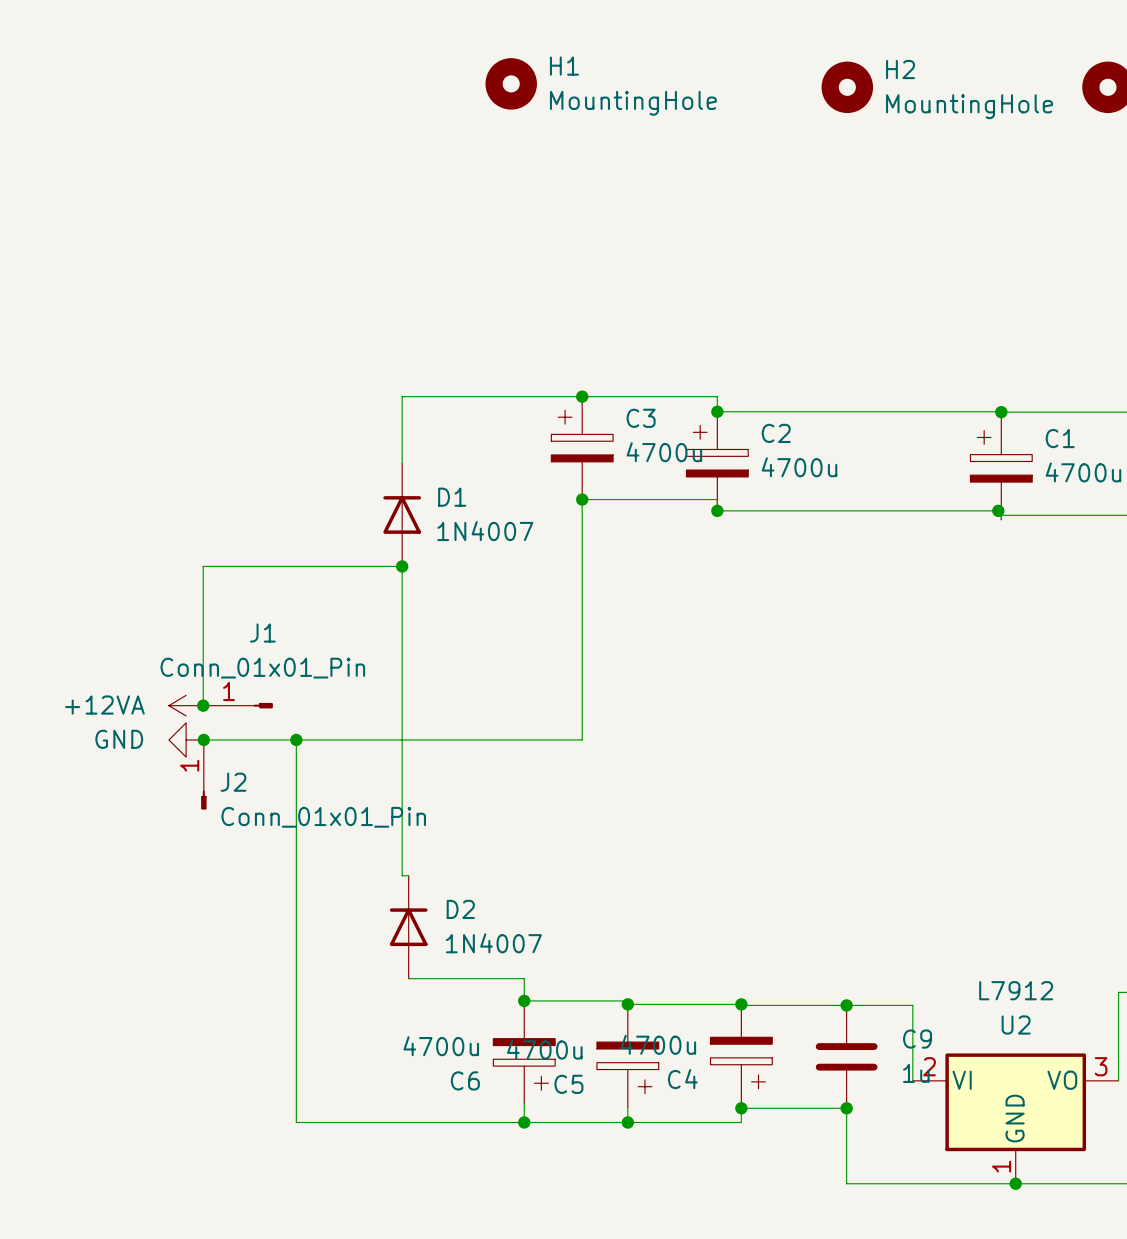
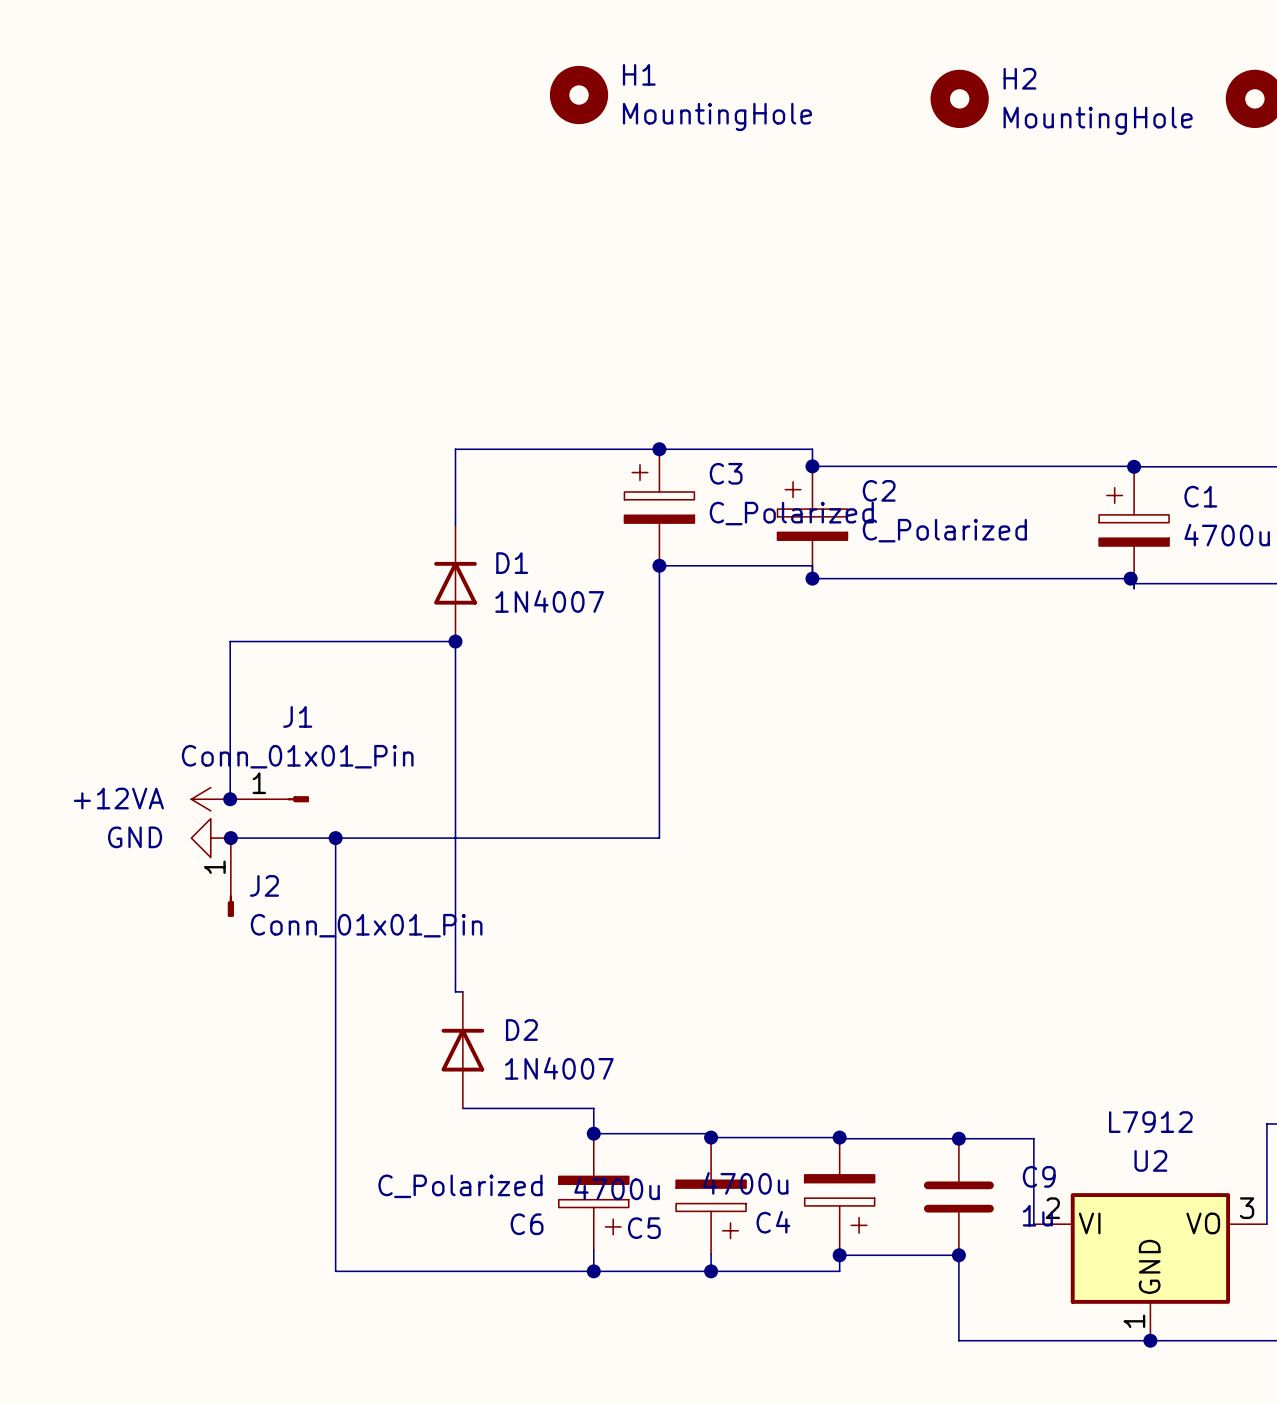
C3 value: 4700u (664, 452) -> C_Polarized (791, 513)
C2 value: 4700u (799, 467) -> C_Polarized (944, 530)
C6 value: 4700u (441, 1046) -> C_Polarized (460, 1186)

